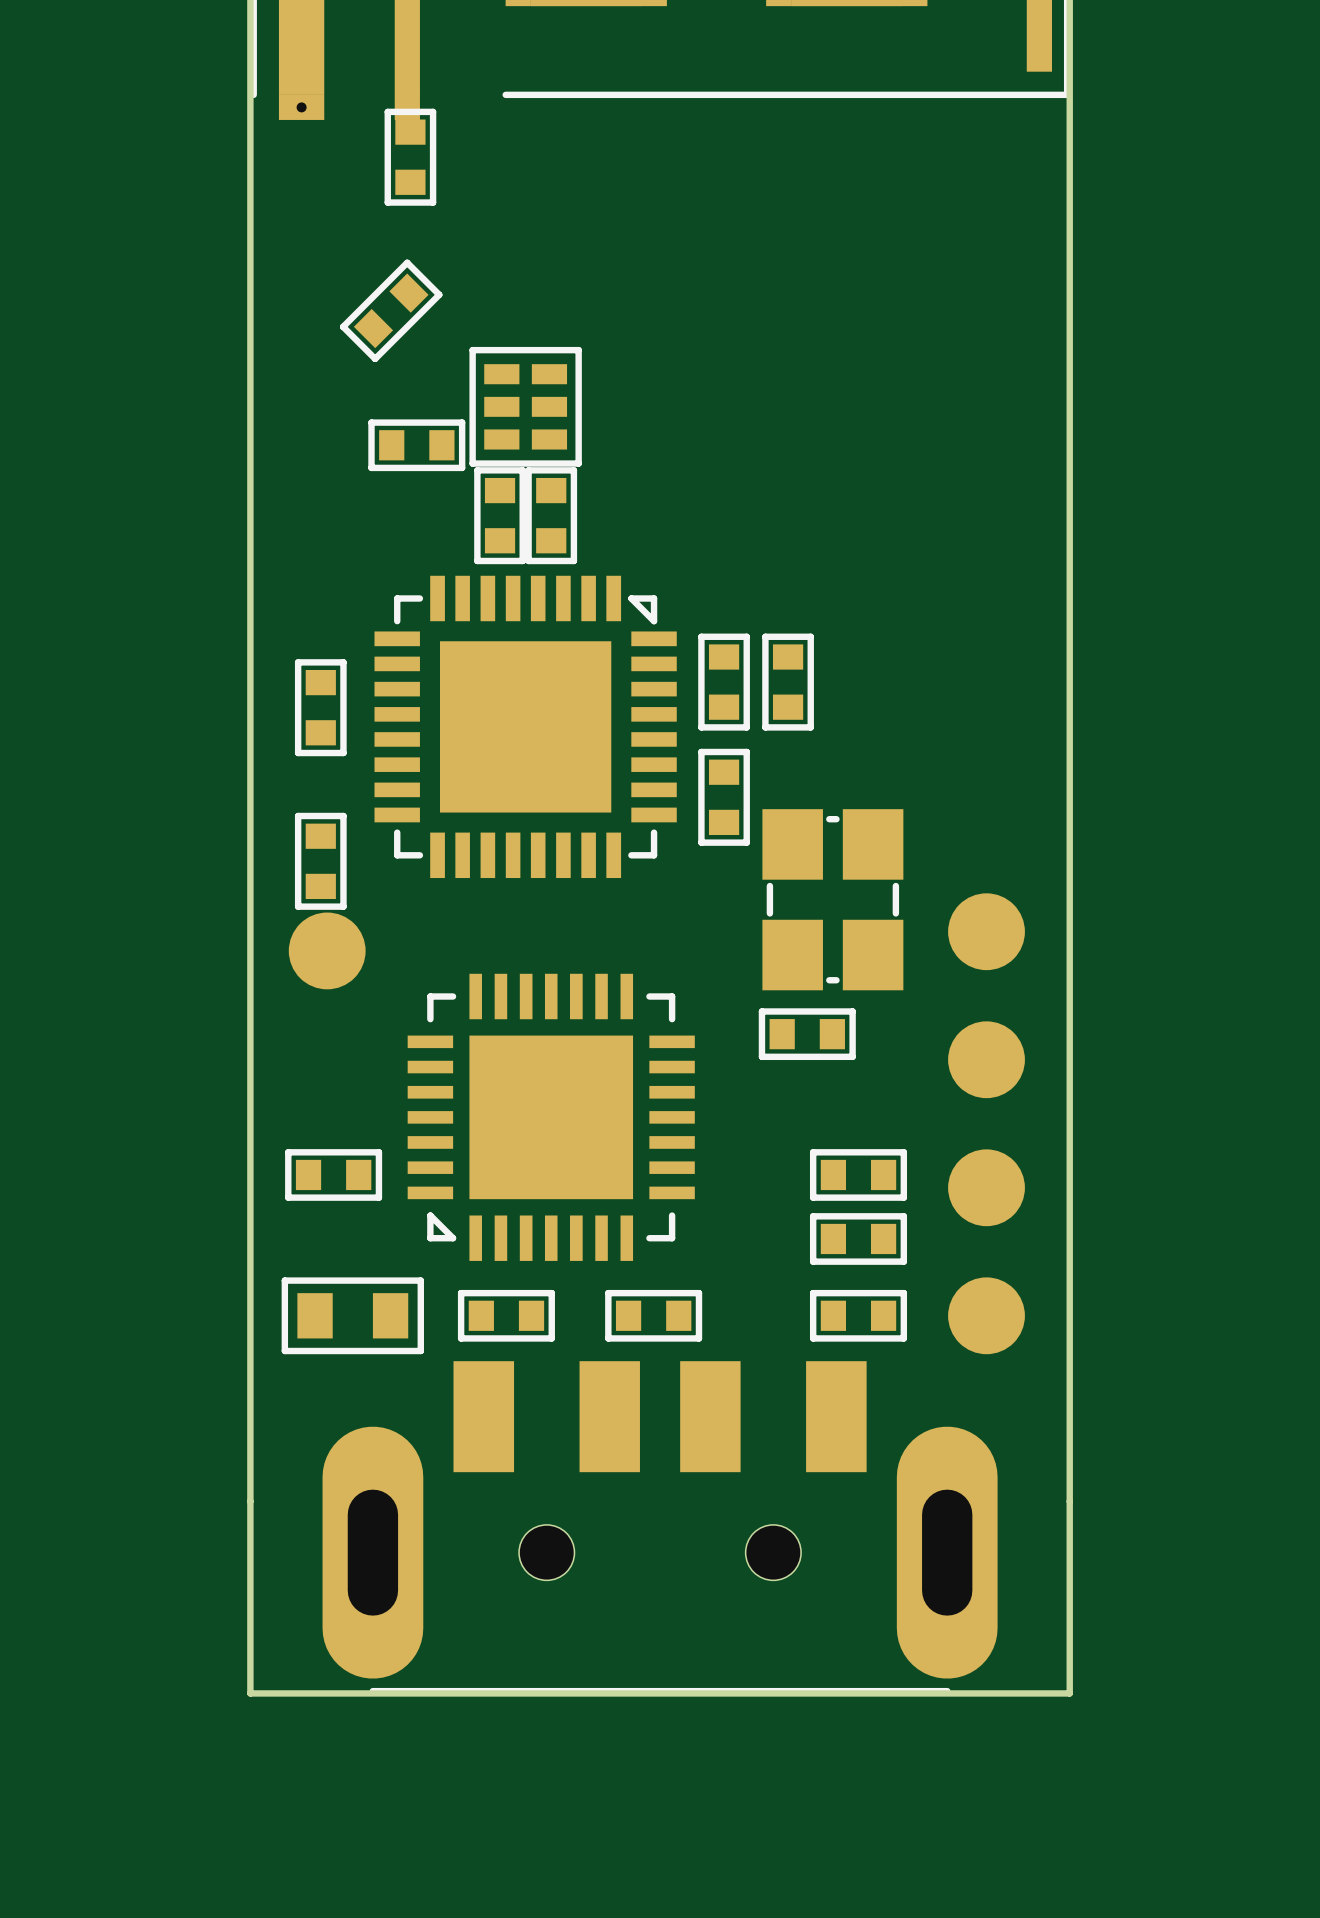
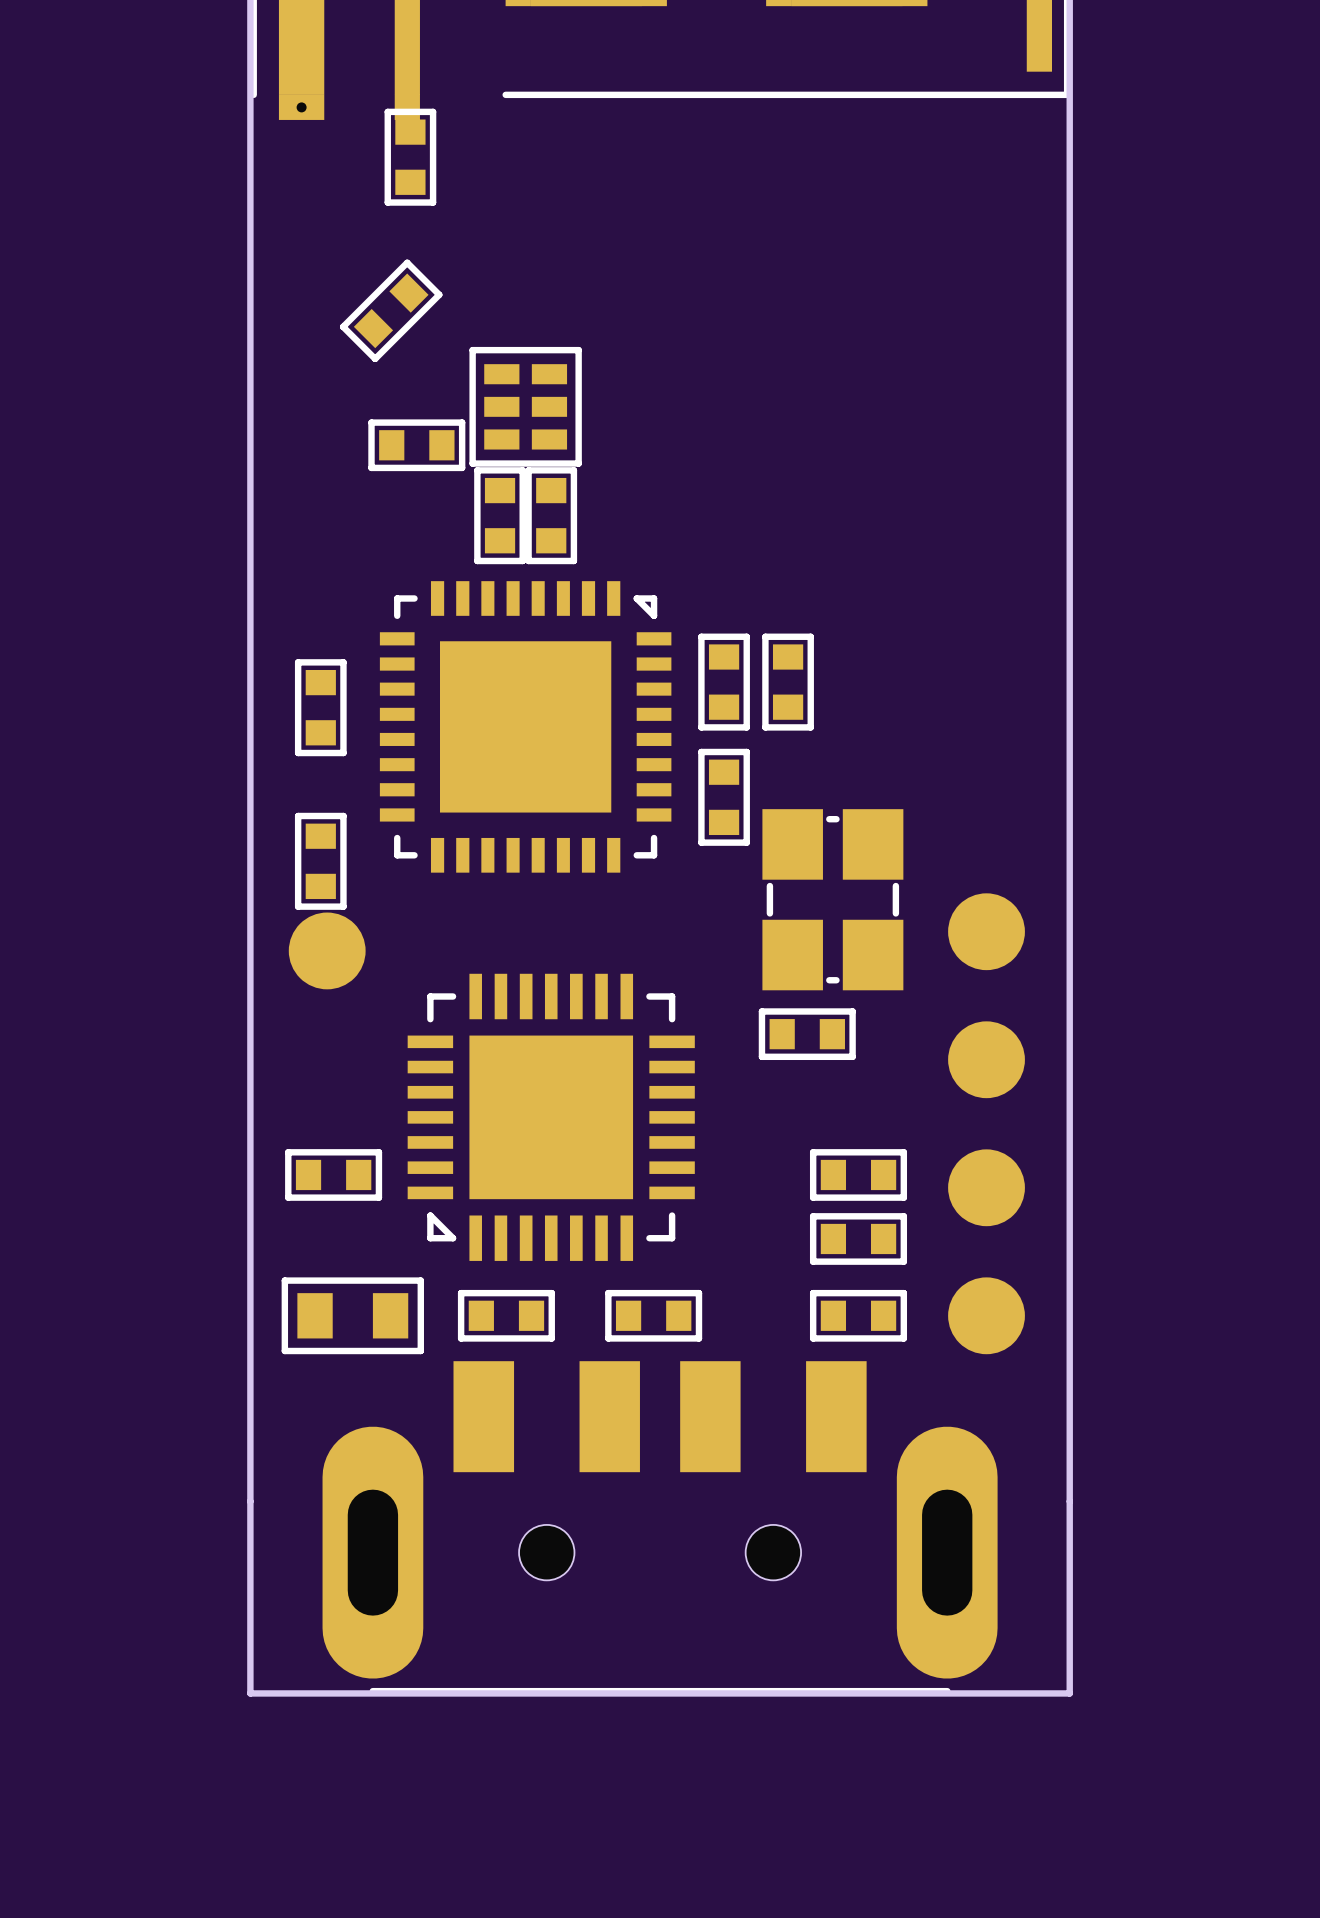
part footprint: [374, 575, 677, 879] -> [379, 581, 672, 873]

